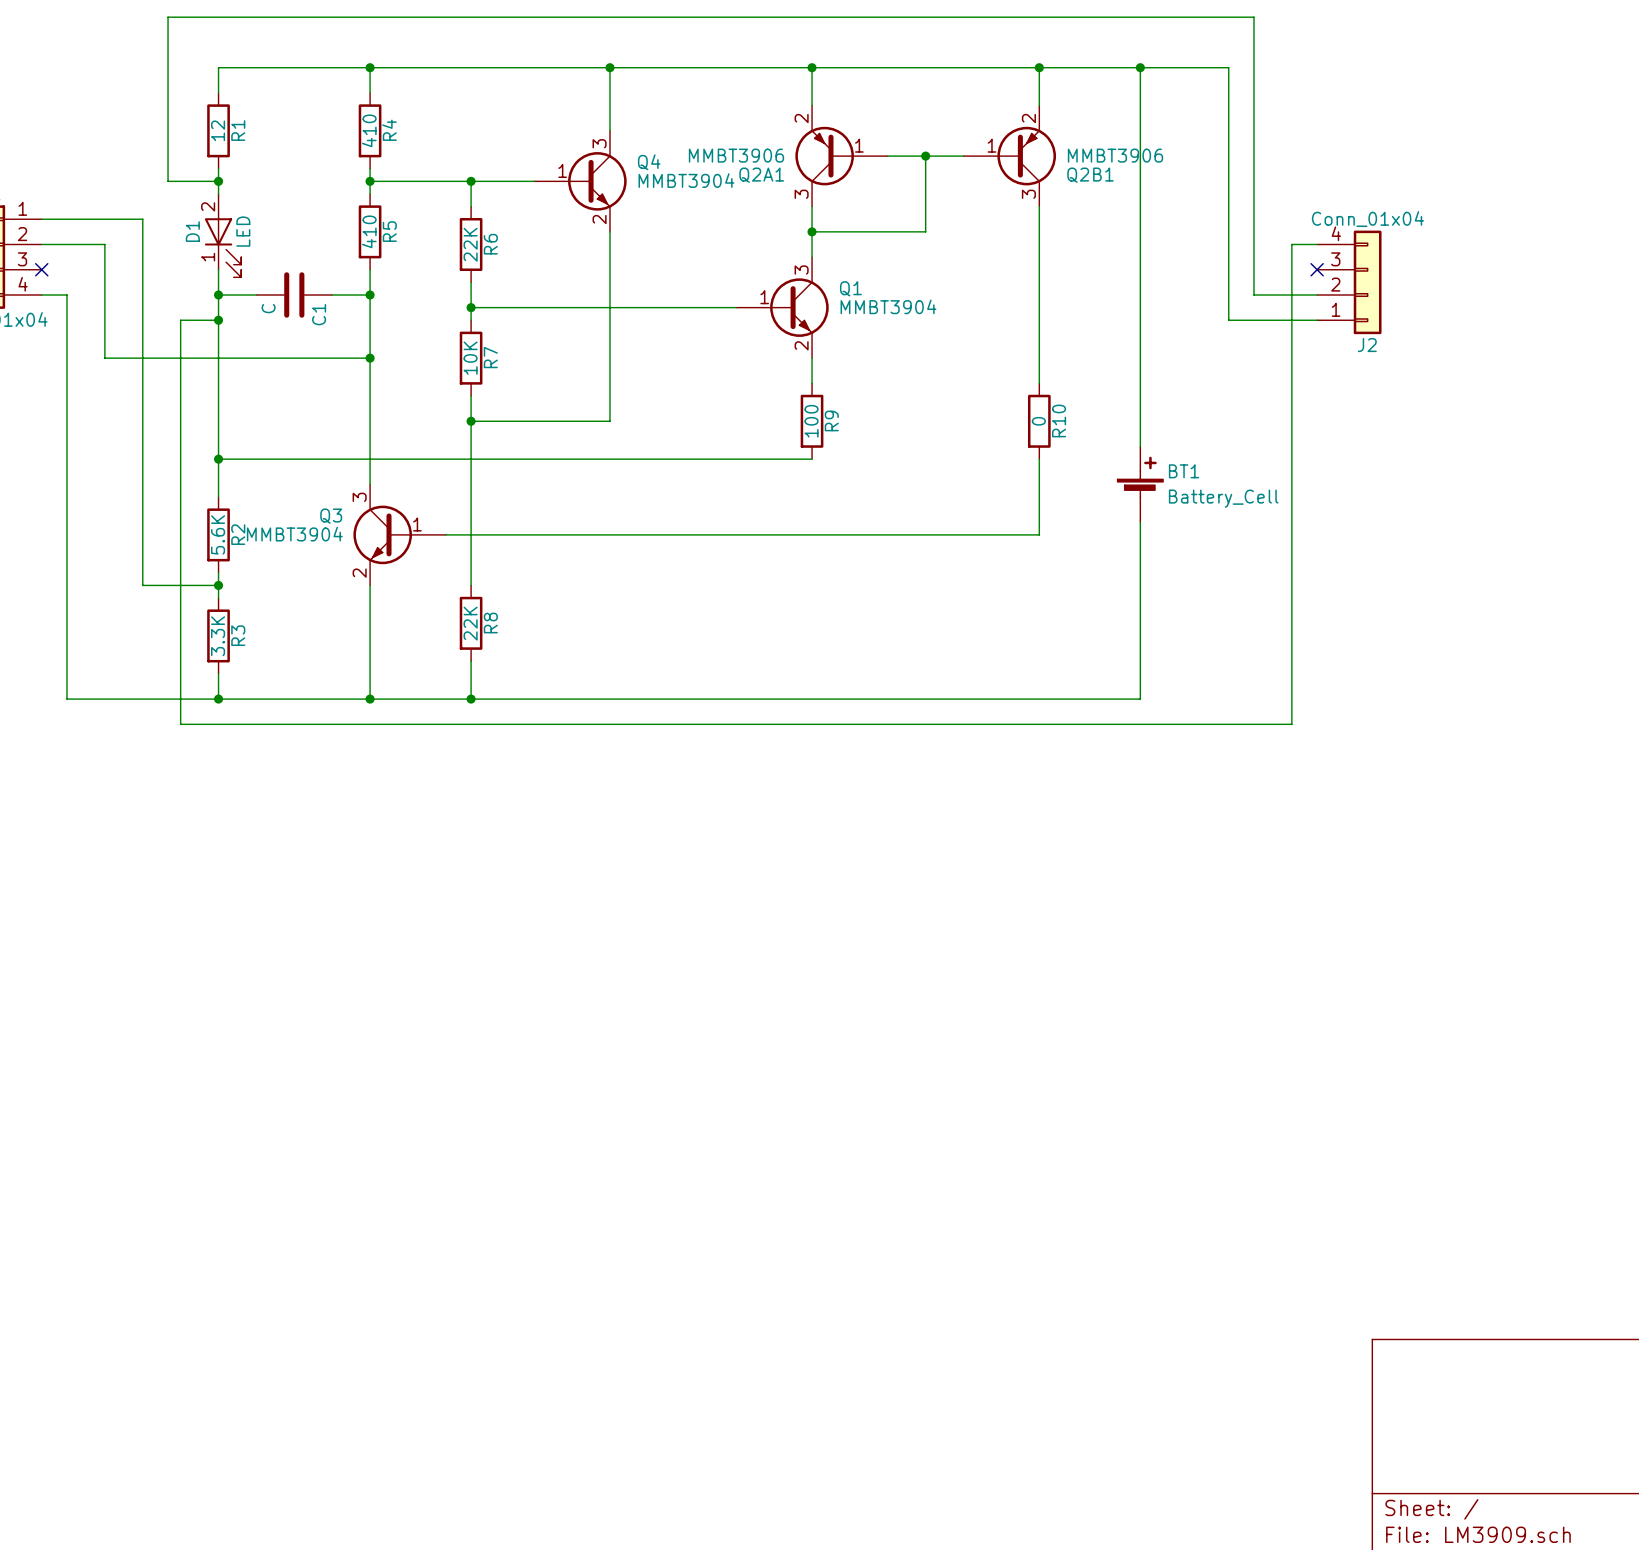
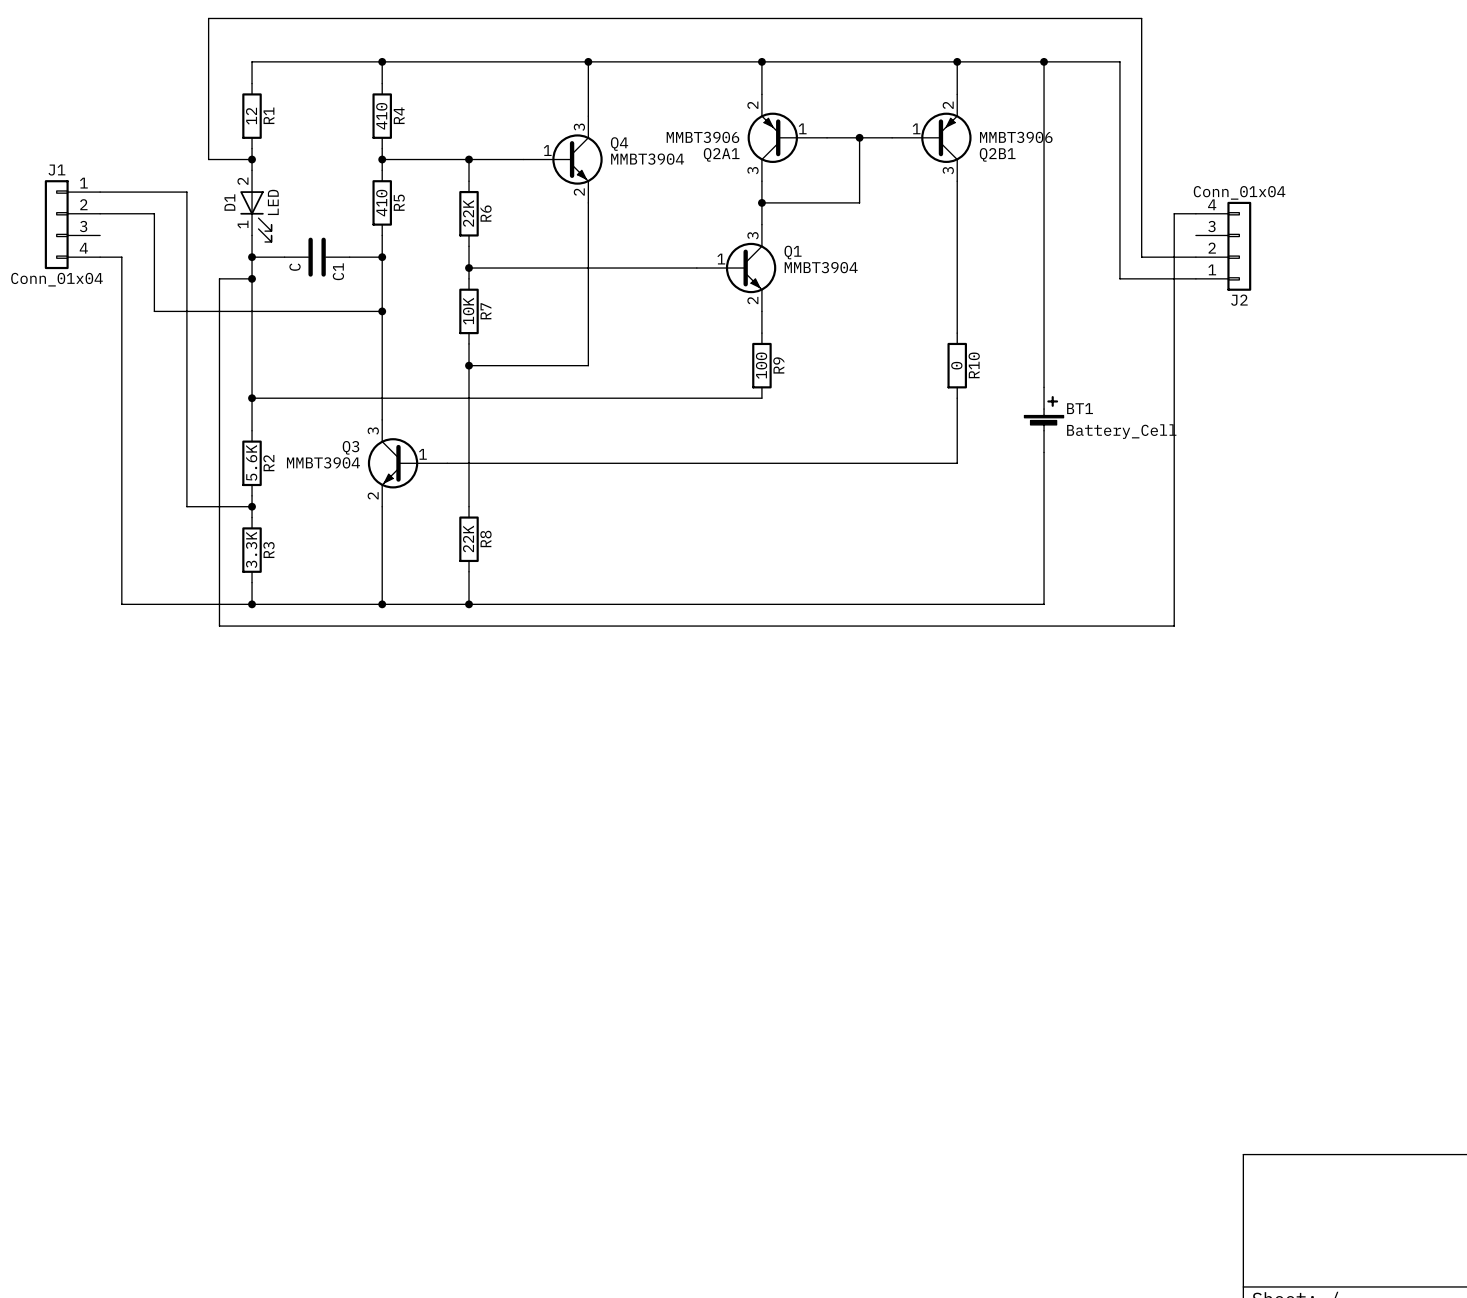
no-connect mark: (41, 269) -> none
no-connect mark: (1317, 269) -> none

